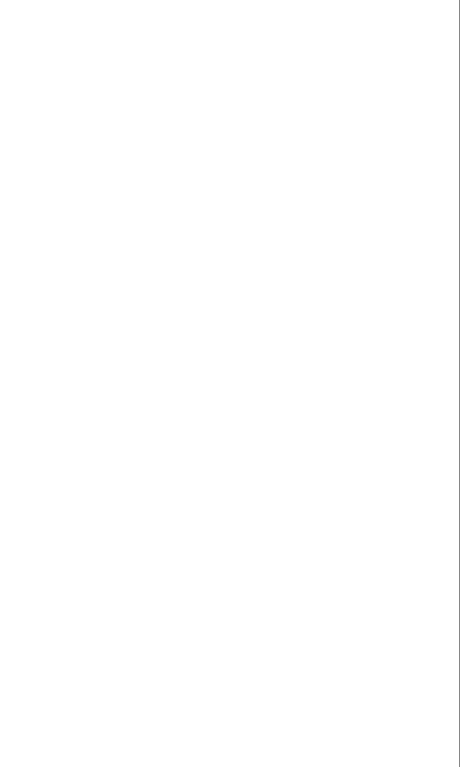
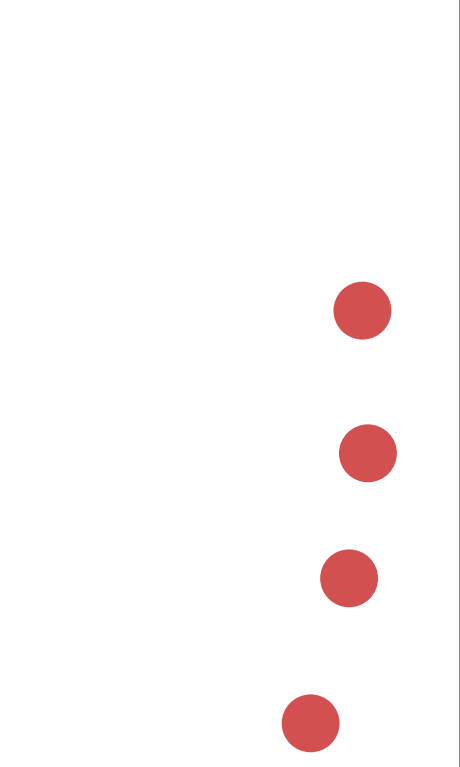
part: none -> (362, 310)
part: none -> (367, 453)
part: none -> (349, 578)
part: none -> (310, 723)

